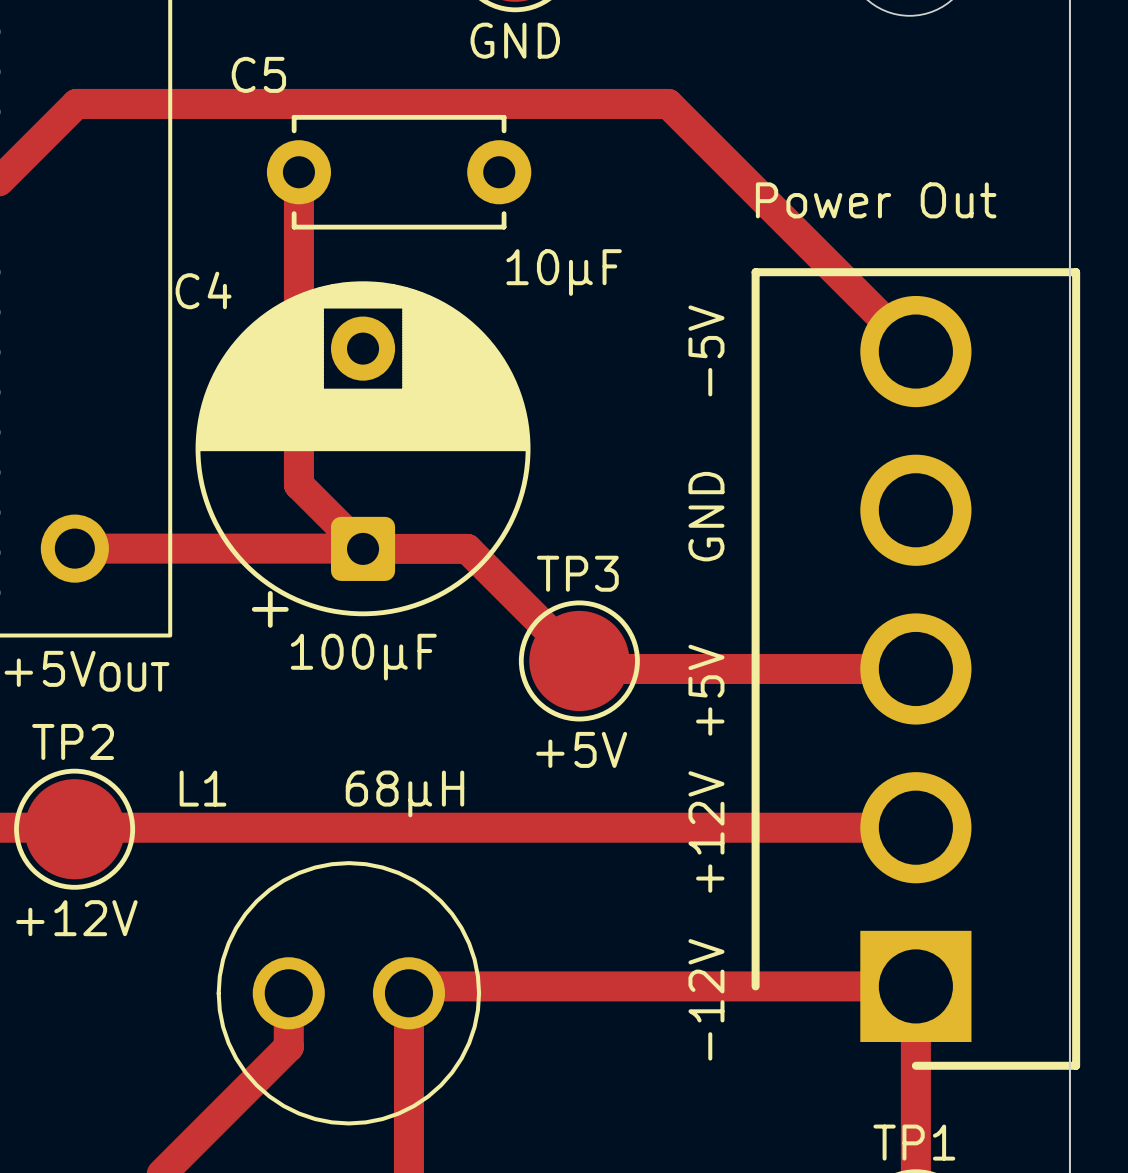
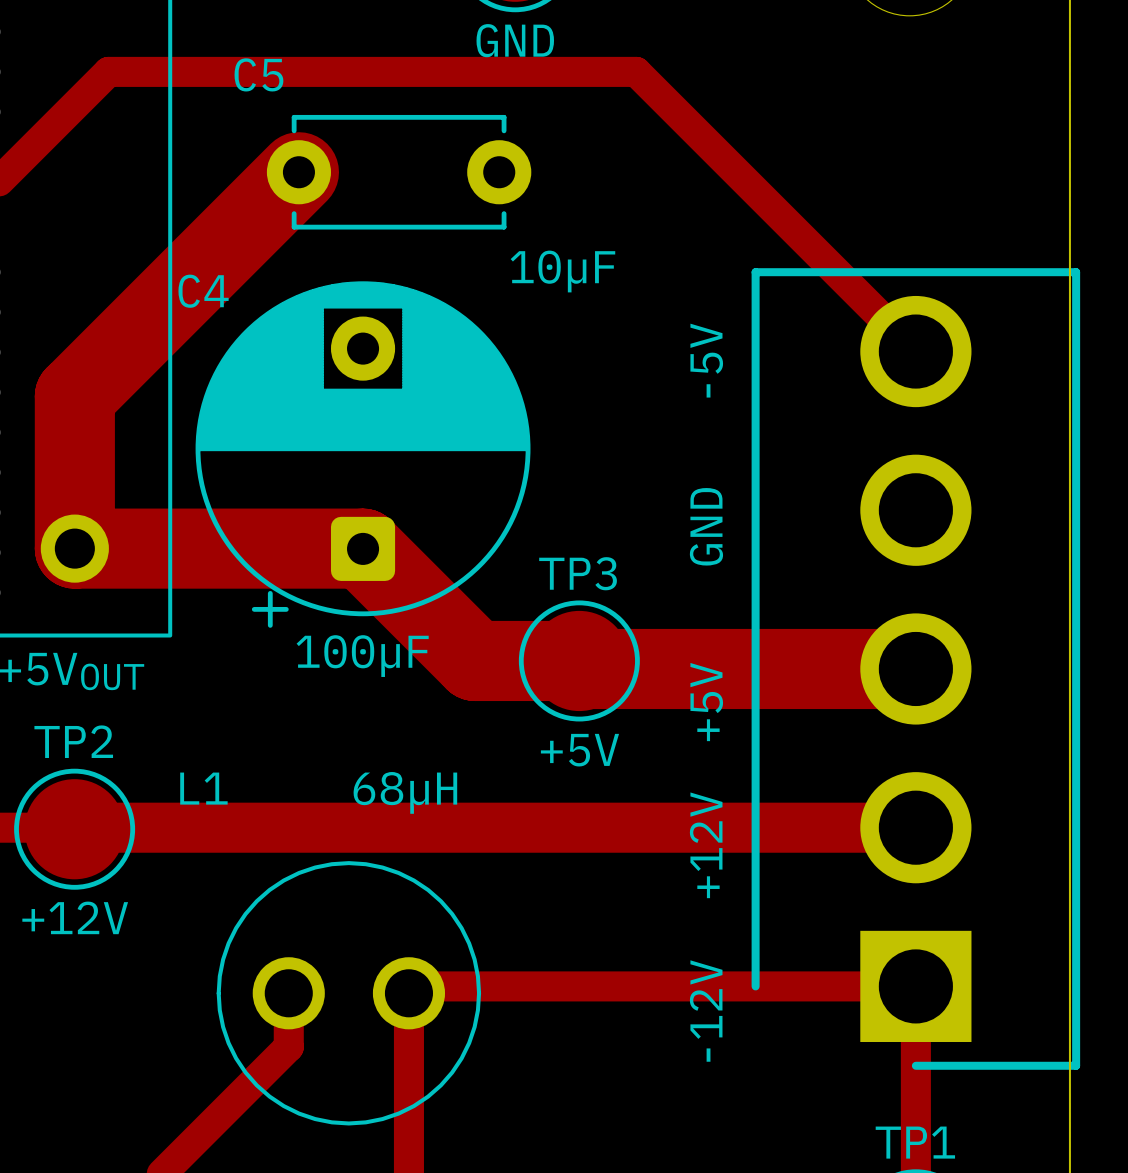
top track: (76, 103) (668, 103) -> (76, 103) (108, 71) (636, 71) (668, 103)
top track: (298, 172) (298, 484) (362, 548) -> (298, 172) (74, 396) (74, 548)
text: Power Out (876, 200) -> none
top track width: thin (74, 548) (362, 548) -> thick (74, 548) (362, 548)
top track: (363, 548) (467, 548) (579, 660) -> (363, 548) (475, 660) (579, 660)
top track width: thin (579, 660) (587, 668) (915, 668) -> thick (579, 660) (587, 668) (915, 668)
top track width: thin (76, 827) (915, 827) -> thick (76, 827) (915, 827)

